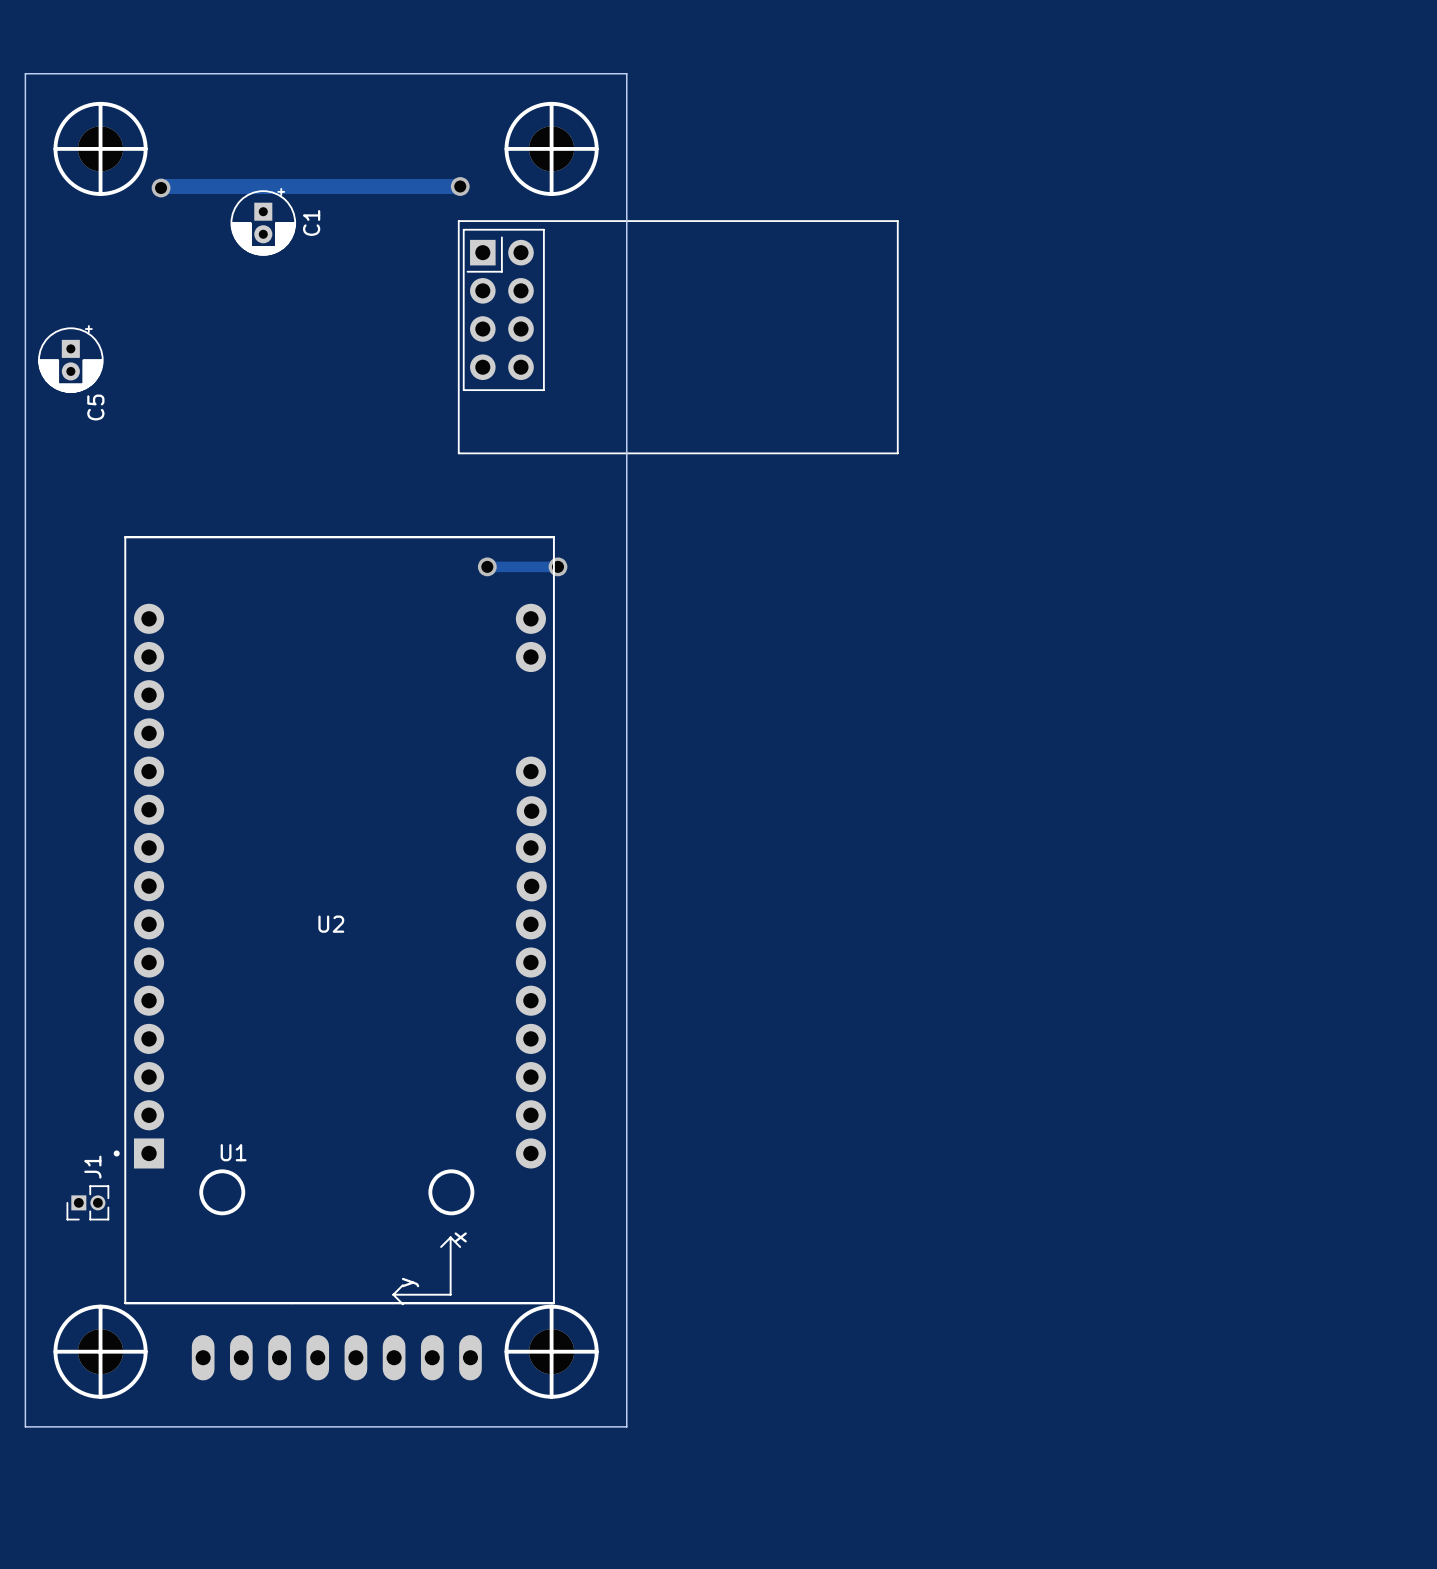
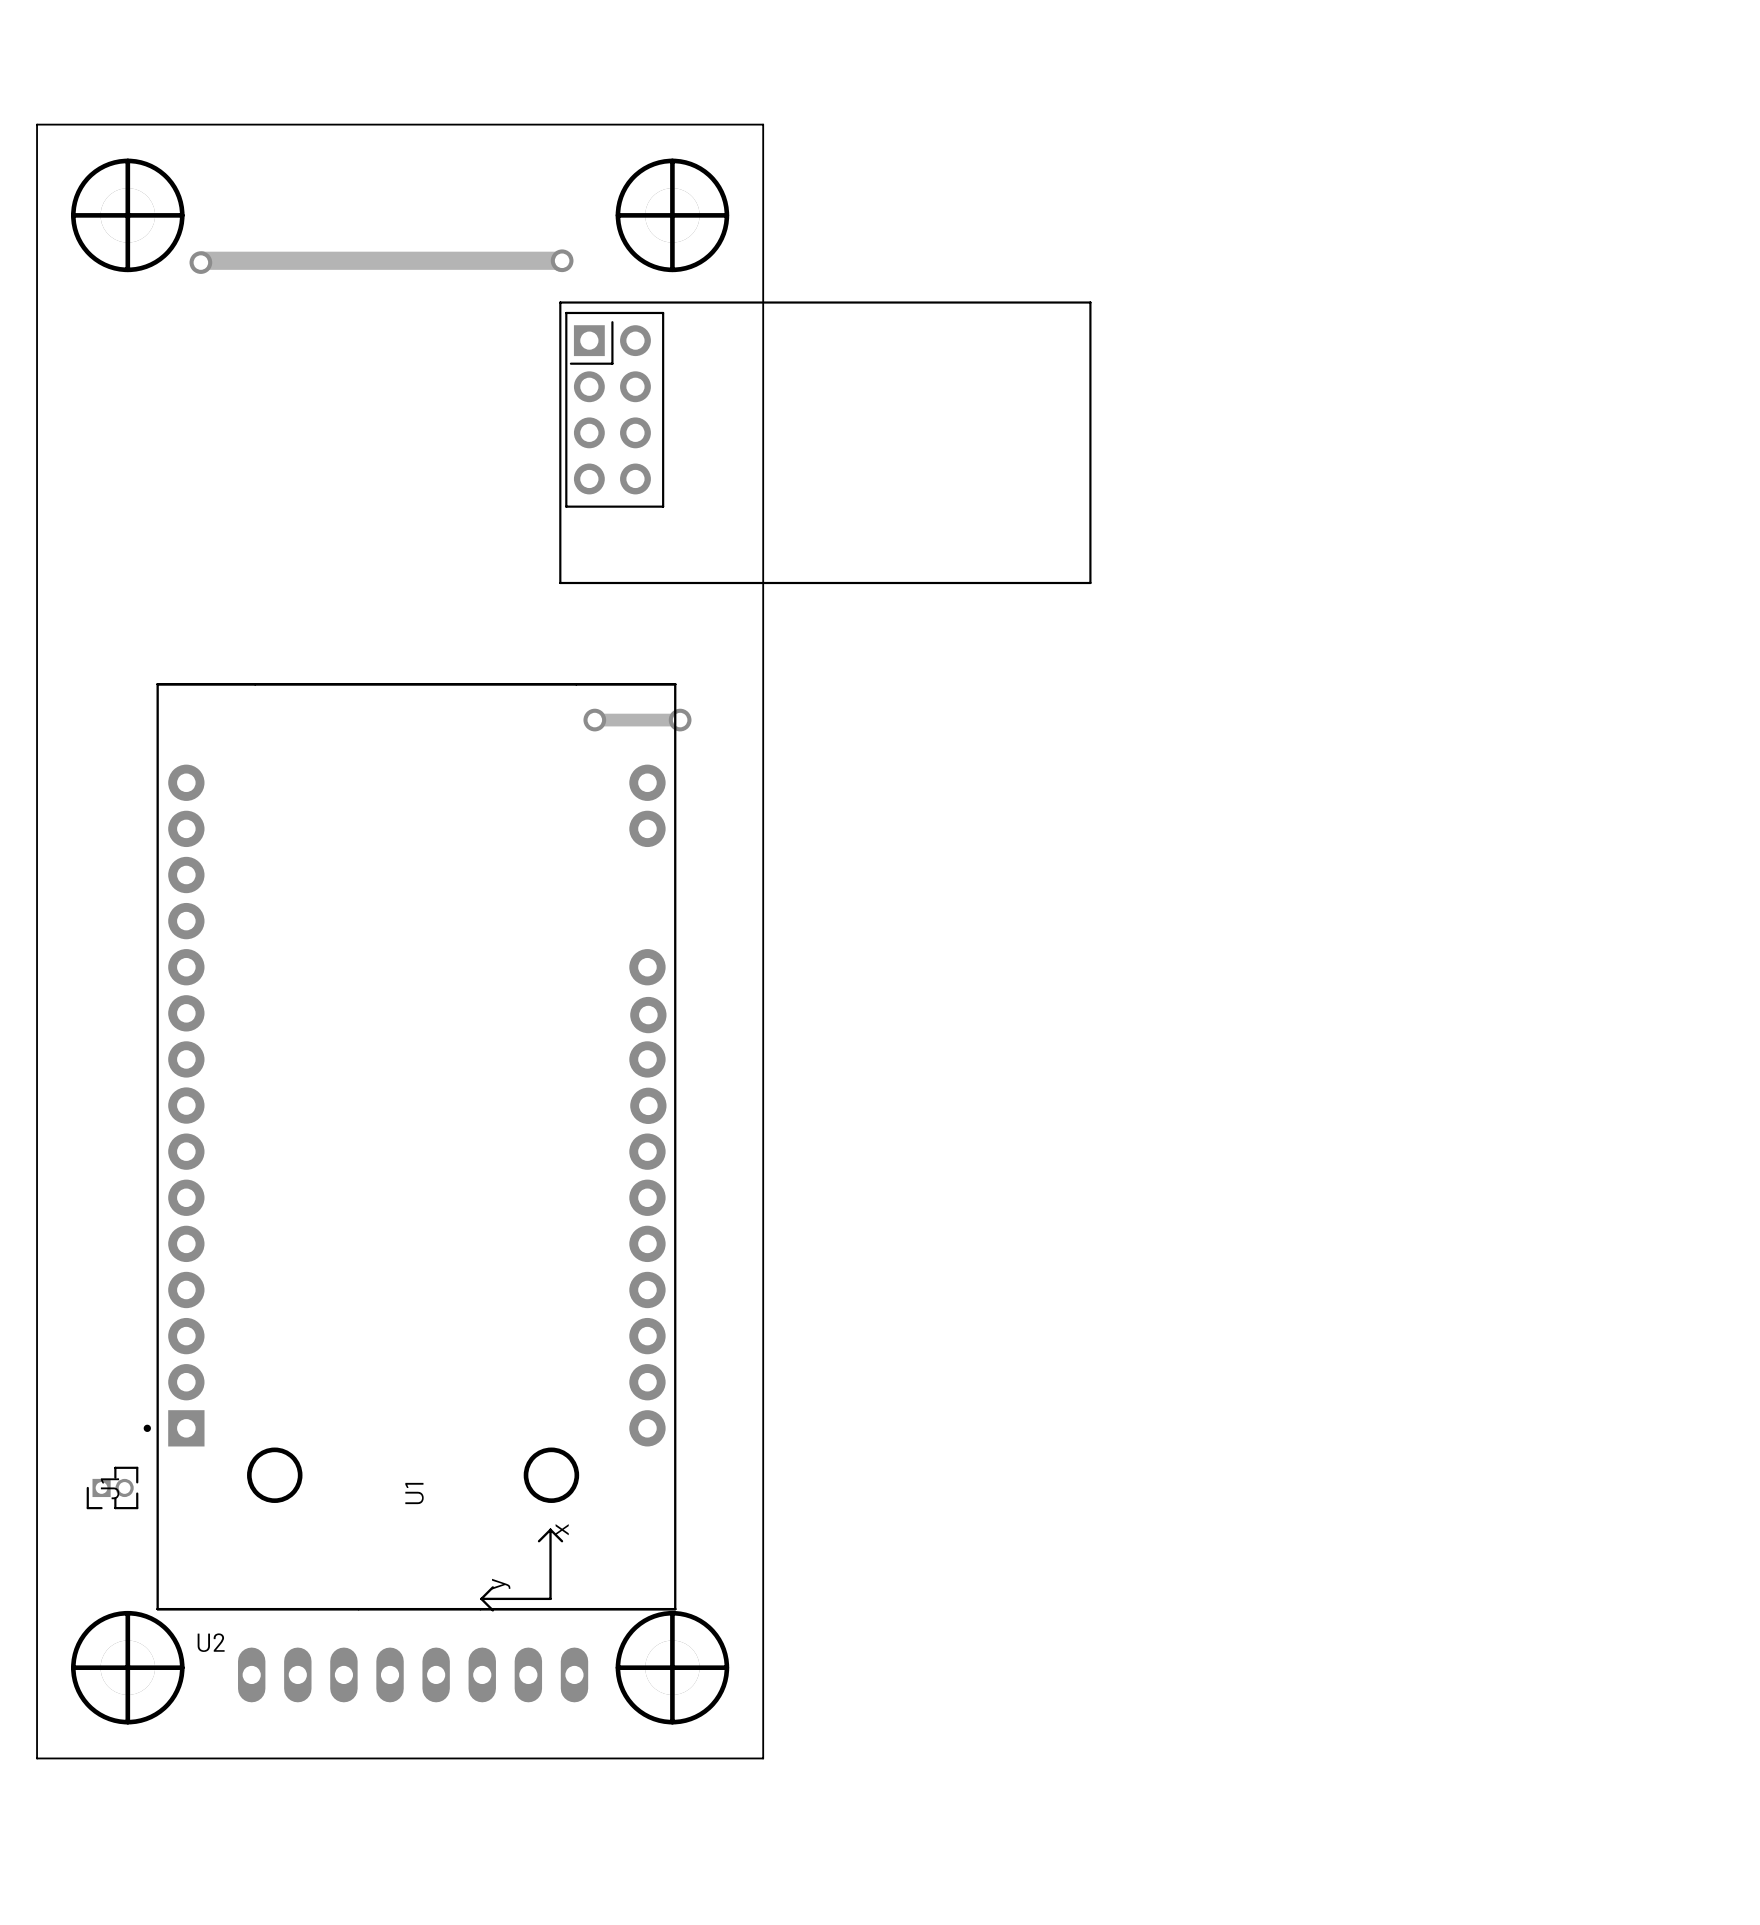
C1: (263, 221) -> none
C5: (70, 359) -> none
U2 name position: U2 (331, 924) -> U2 (211, 1642)
U1 name rotation: 0° (233, 1152) -> 90° counterclockwise (414, 1493)
U1 name position: U1 (233, 1152) -> U1 (414, 1493)
J1 name position: J1 (92, 1167) -> J1 (110, 1488)

